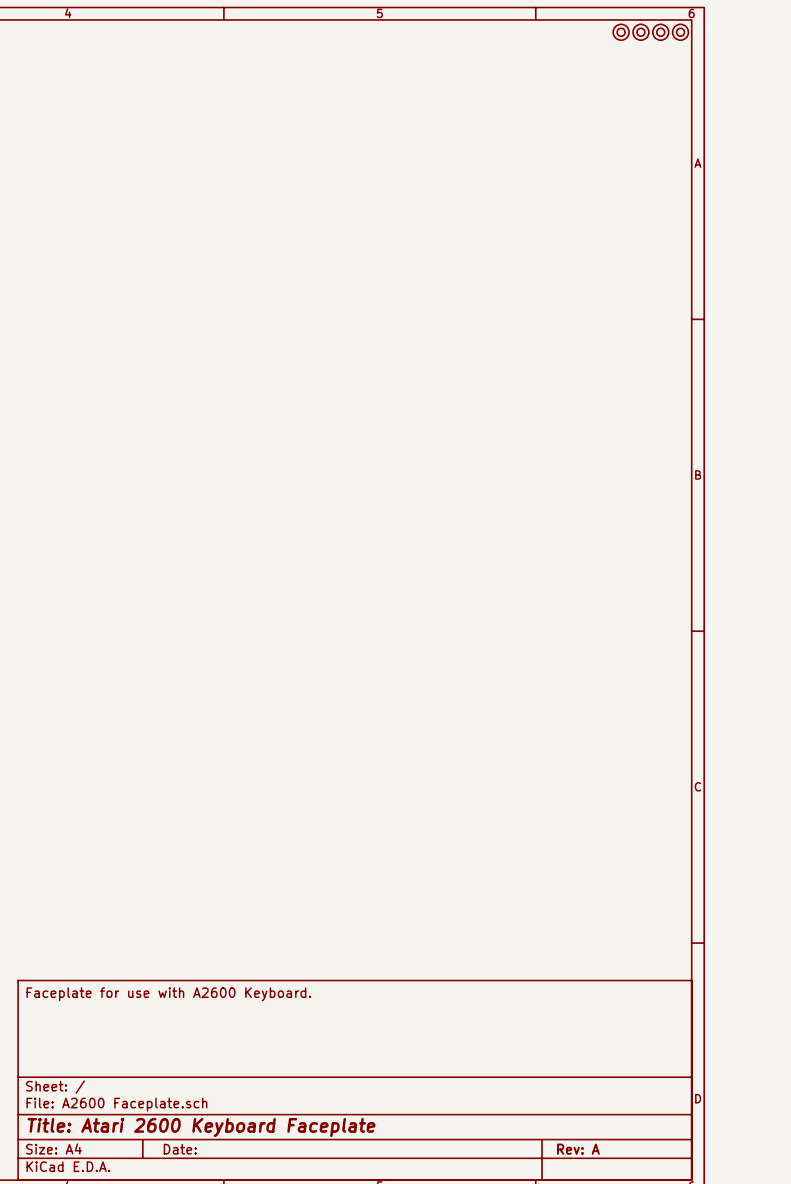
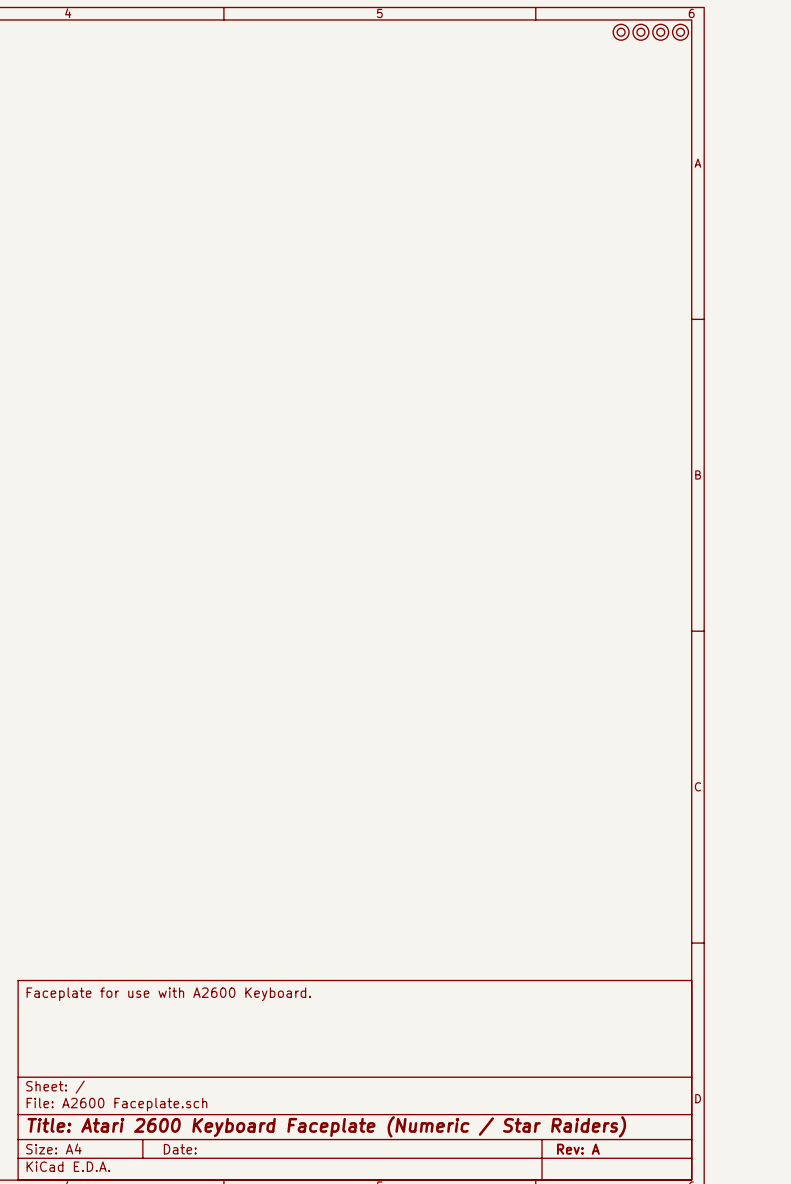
title block: Title: Atari 2600 Keyboard Faceplate (201, 1127) -> Title: Atari 2600 Keyboard Faceplate (Numeric / Star Raiders) (326, 1126)

